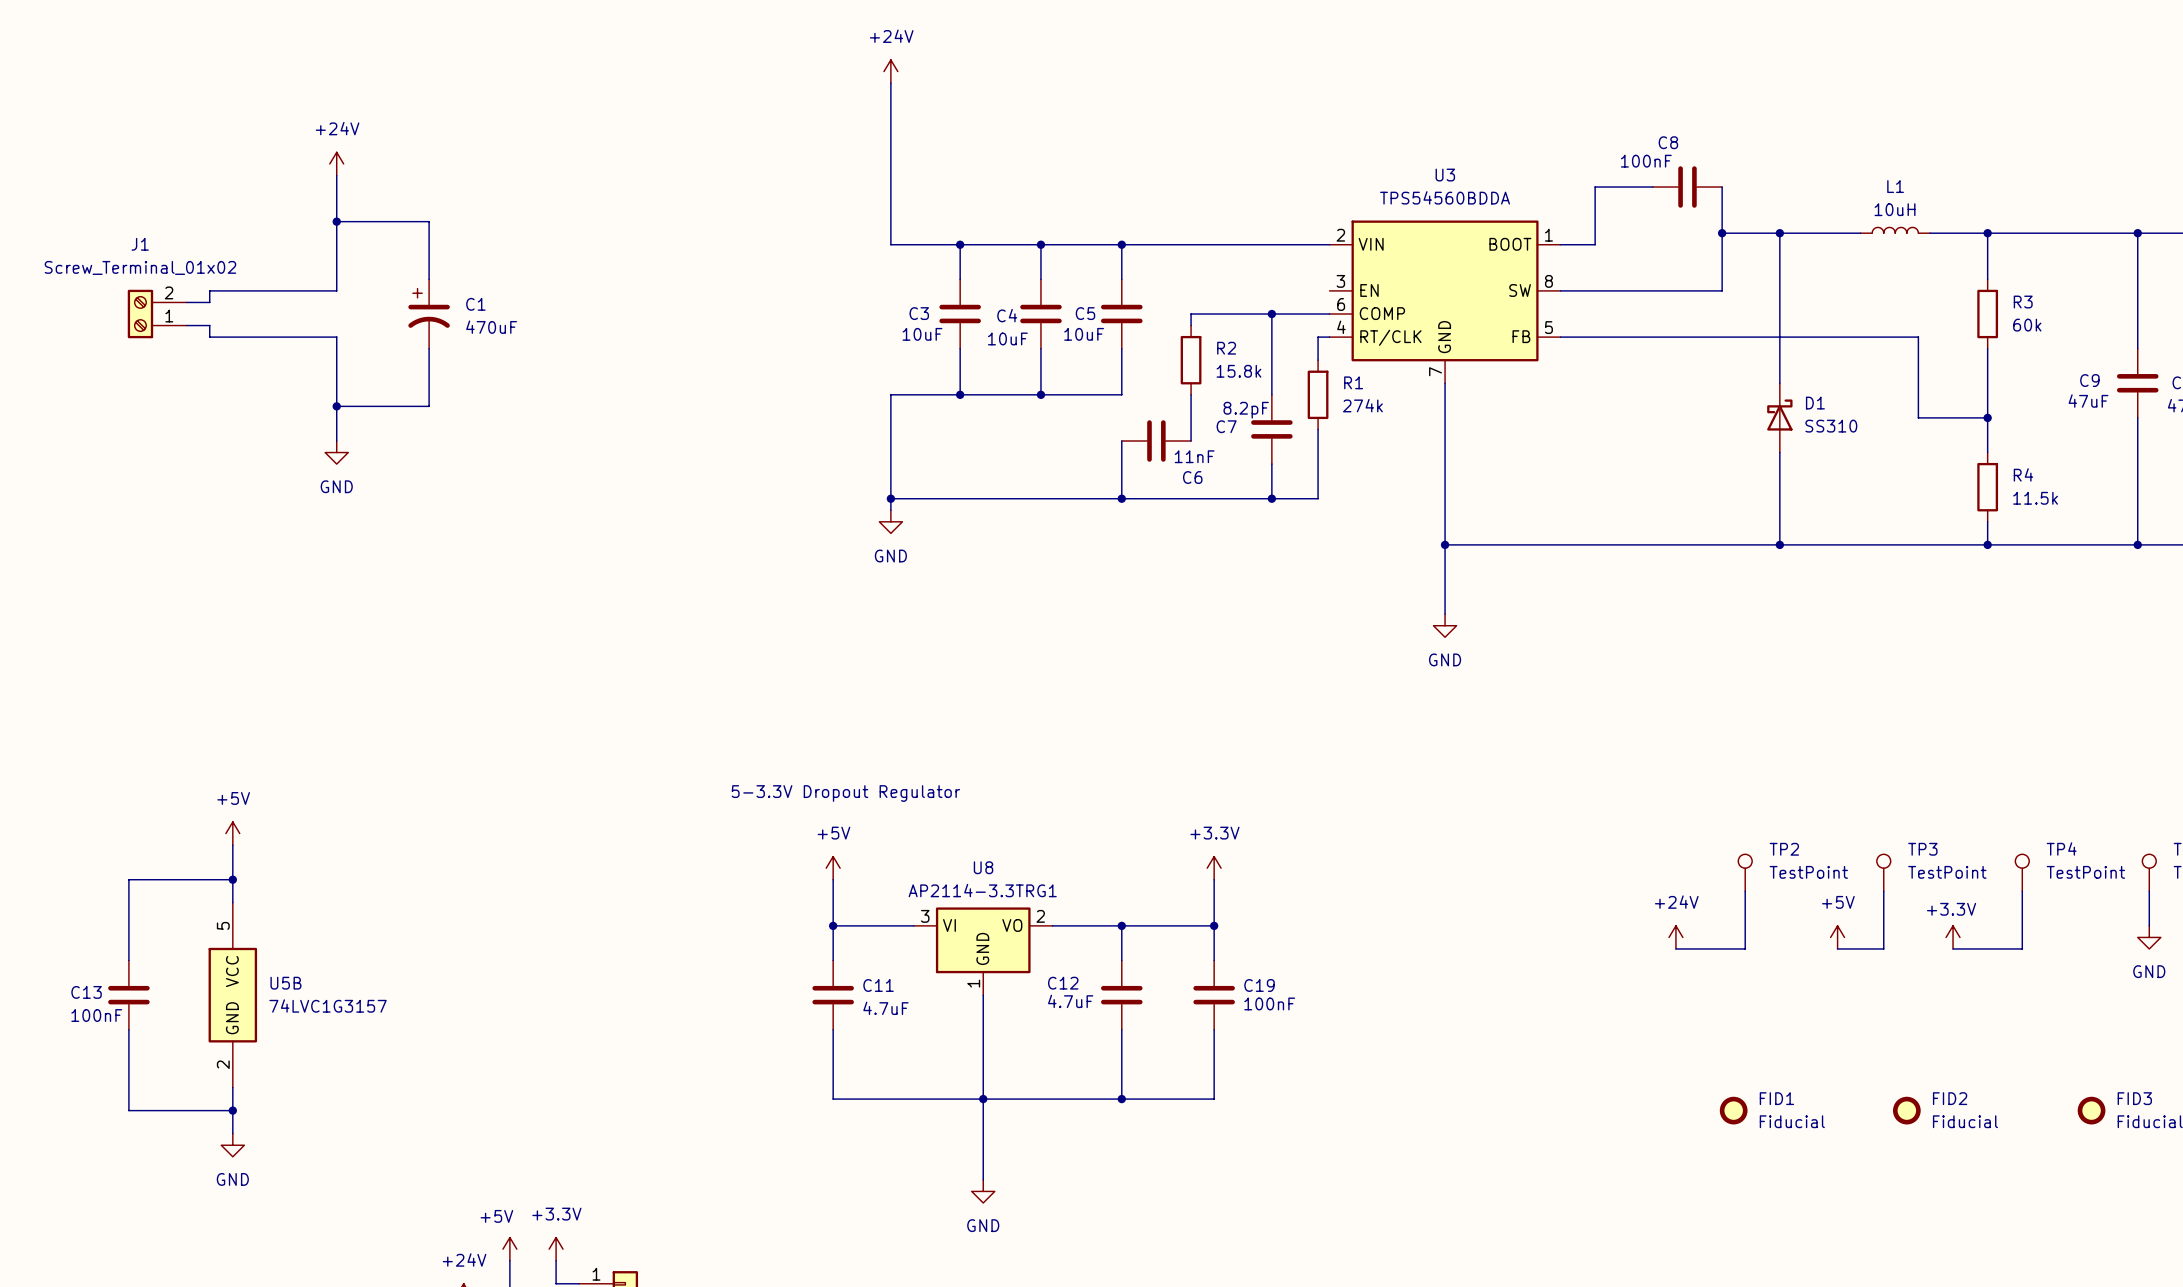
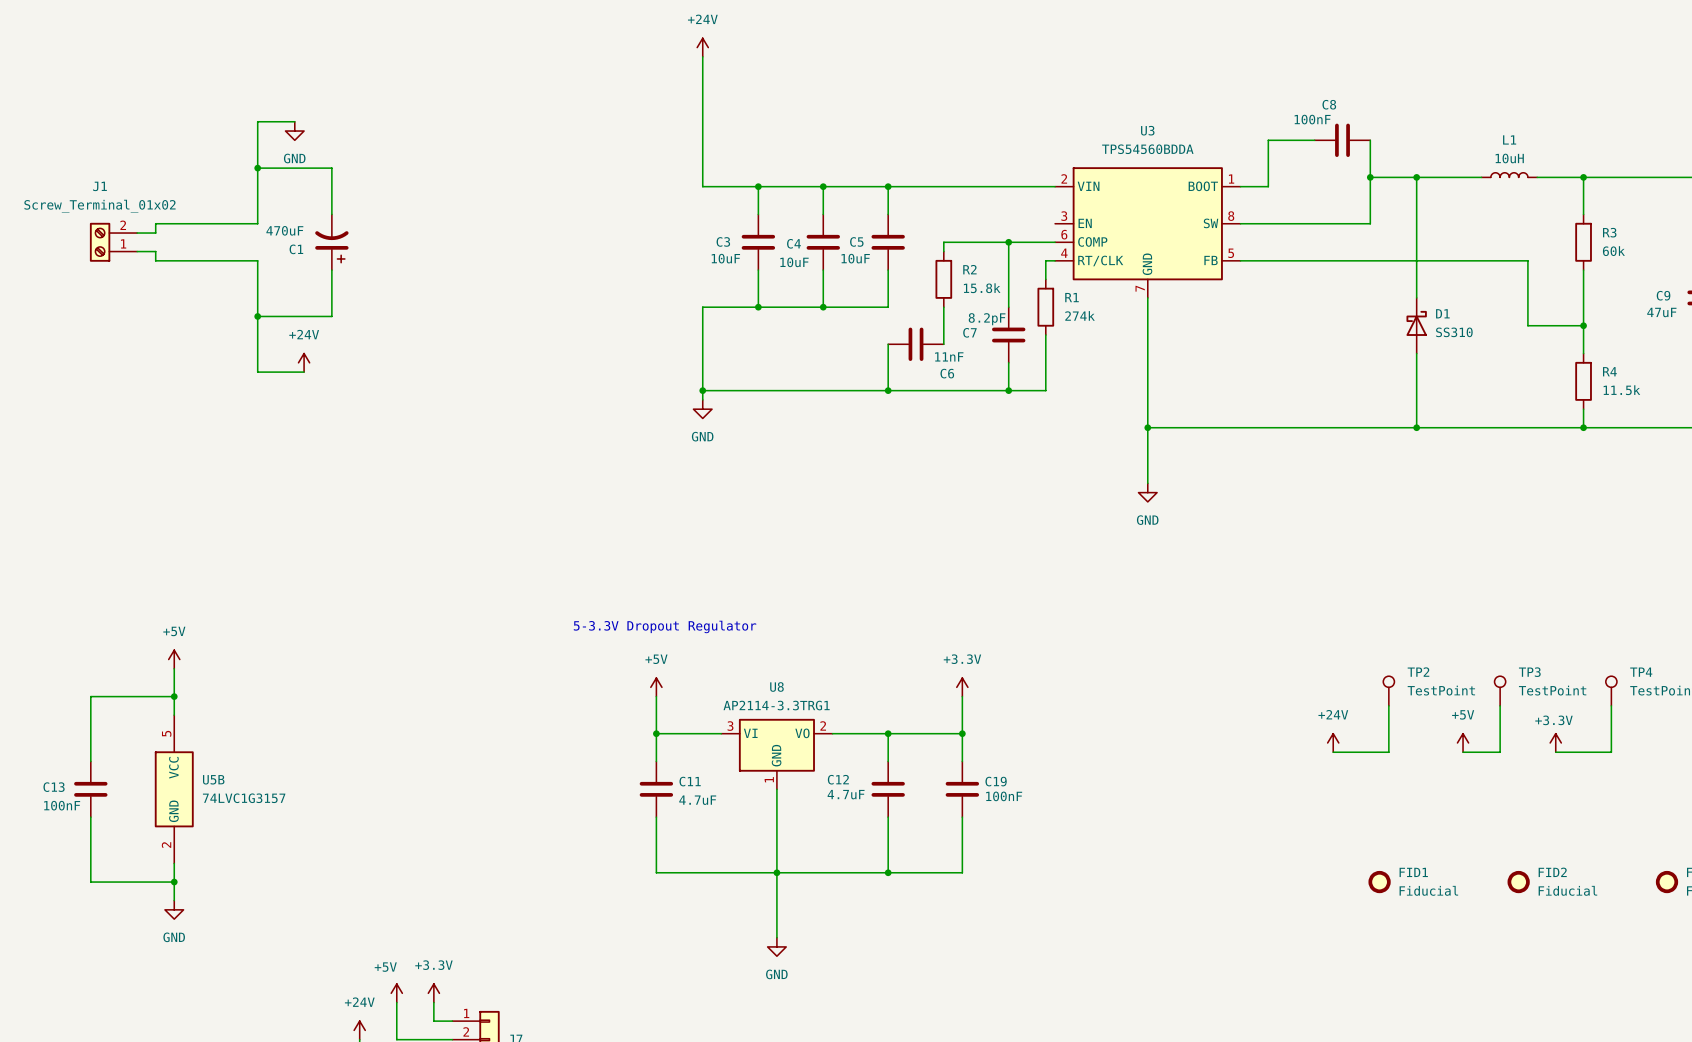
power symbol: +24V (336, 163) -> none
wire: none -> (294, 121) (257, 121) (257, 131)
power symbol: none -> GND (294, 131)
C1 rotation: 0° (429, 308) -> 180° (331, 246)
wire: none -> (257, 344) (257, 372) (304, 372)
power symbol: GND (336, 452) -> none
power symbol: none -> +24V (304, 362)

